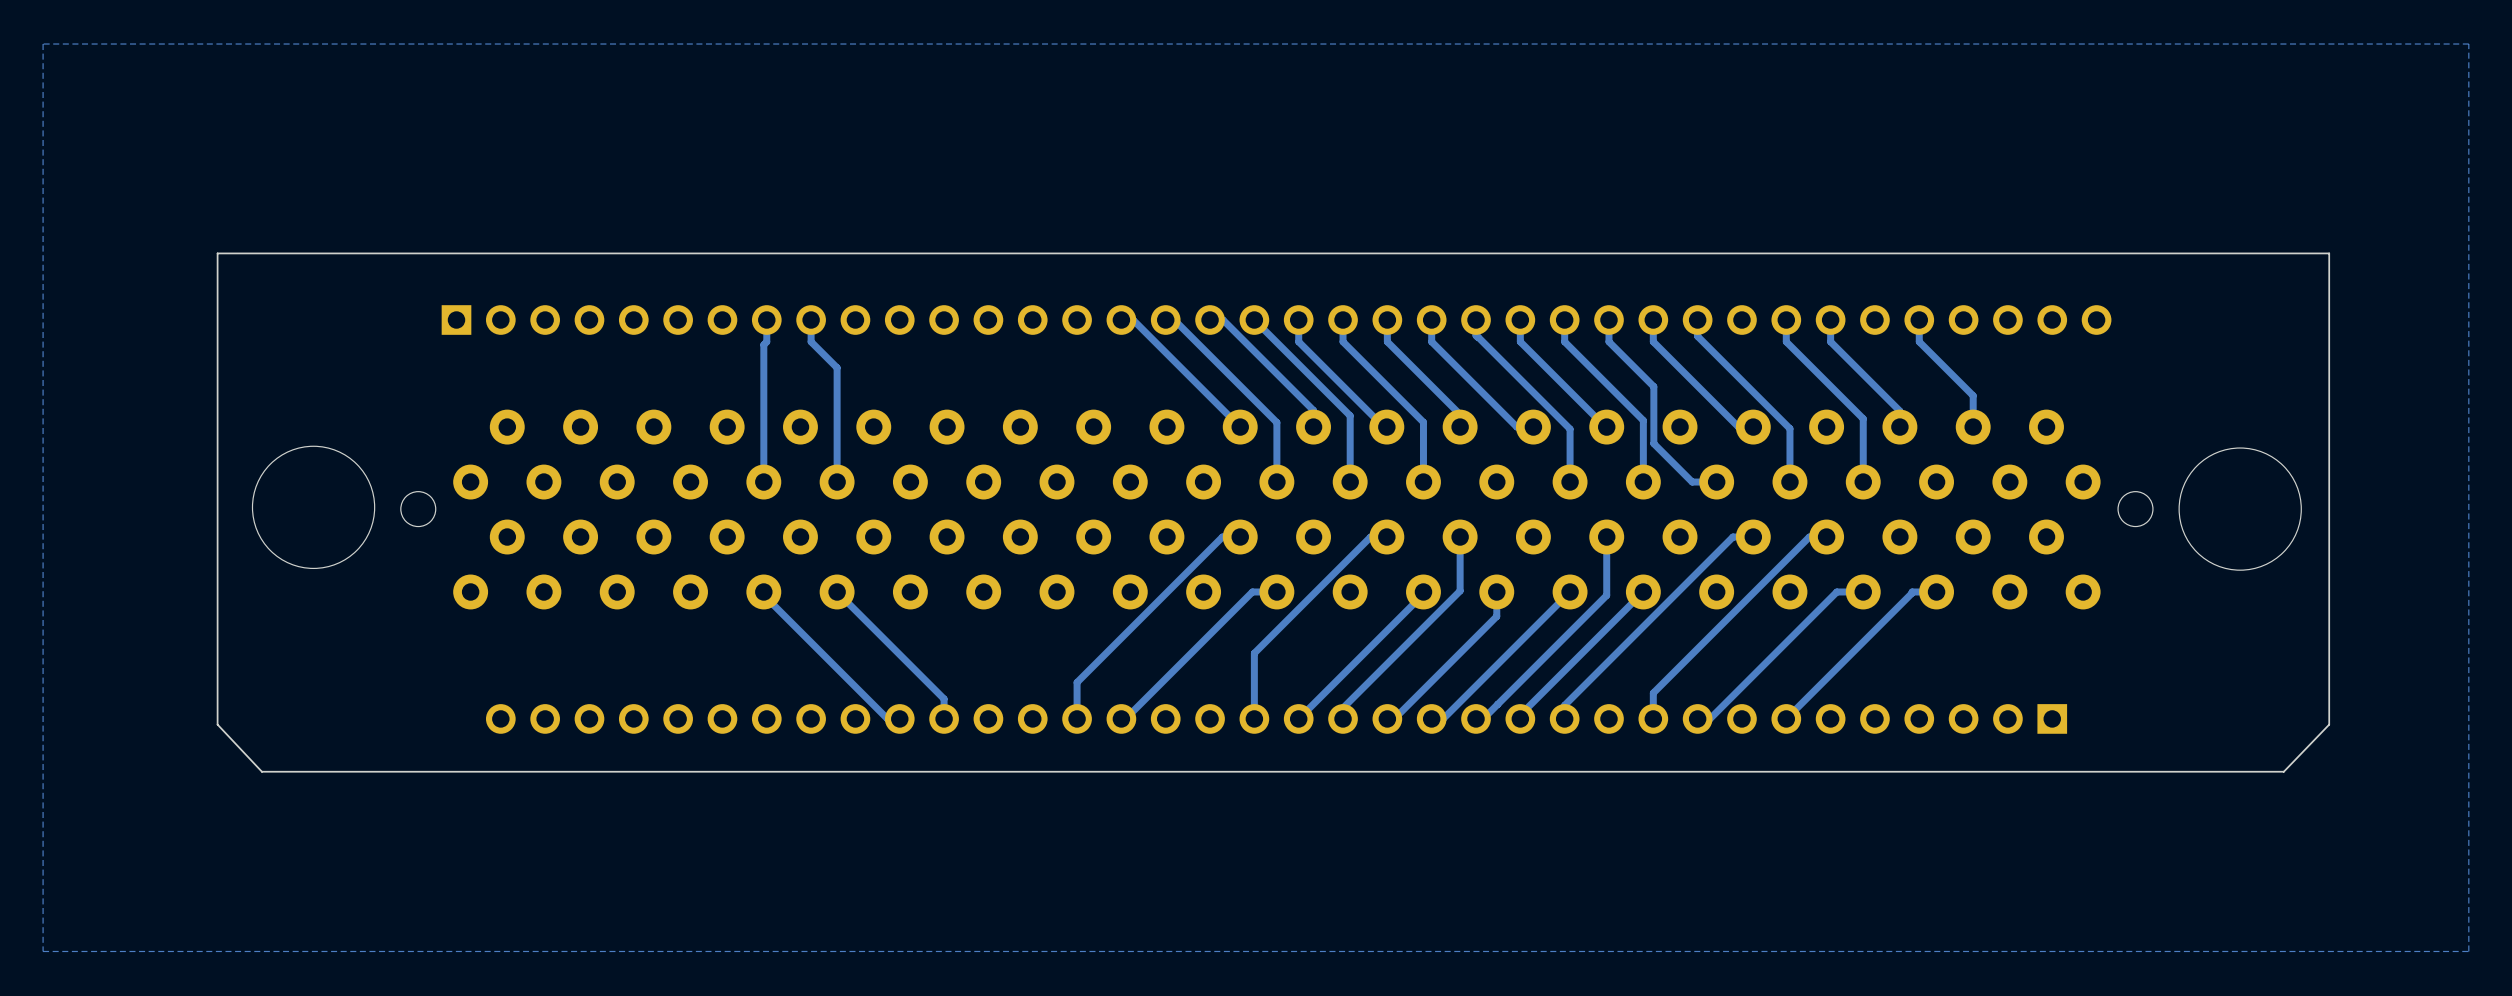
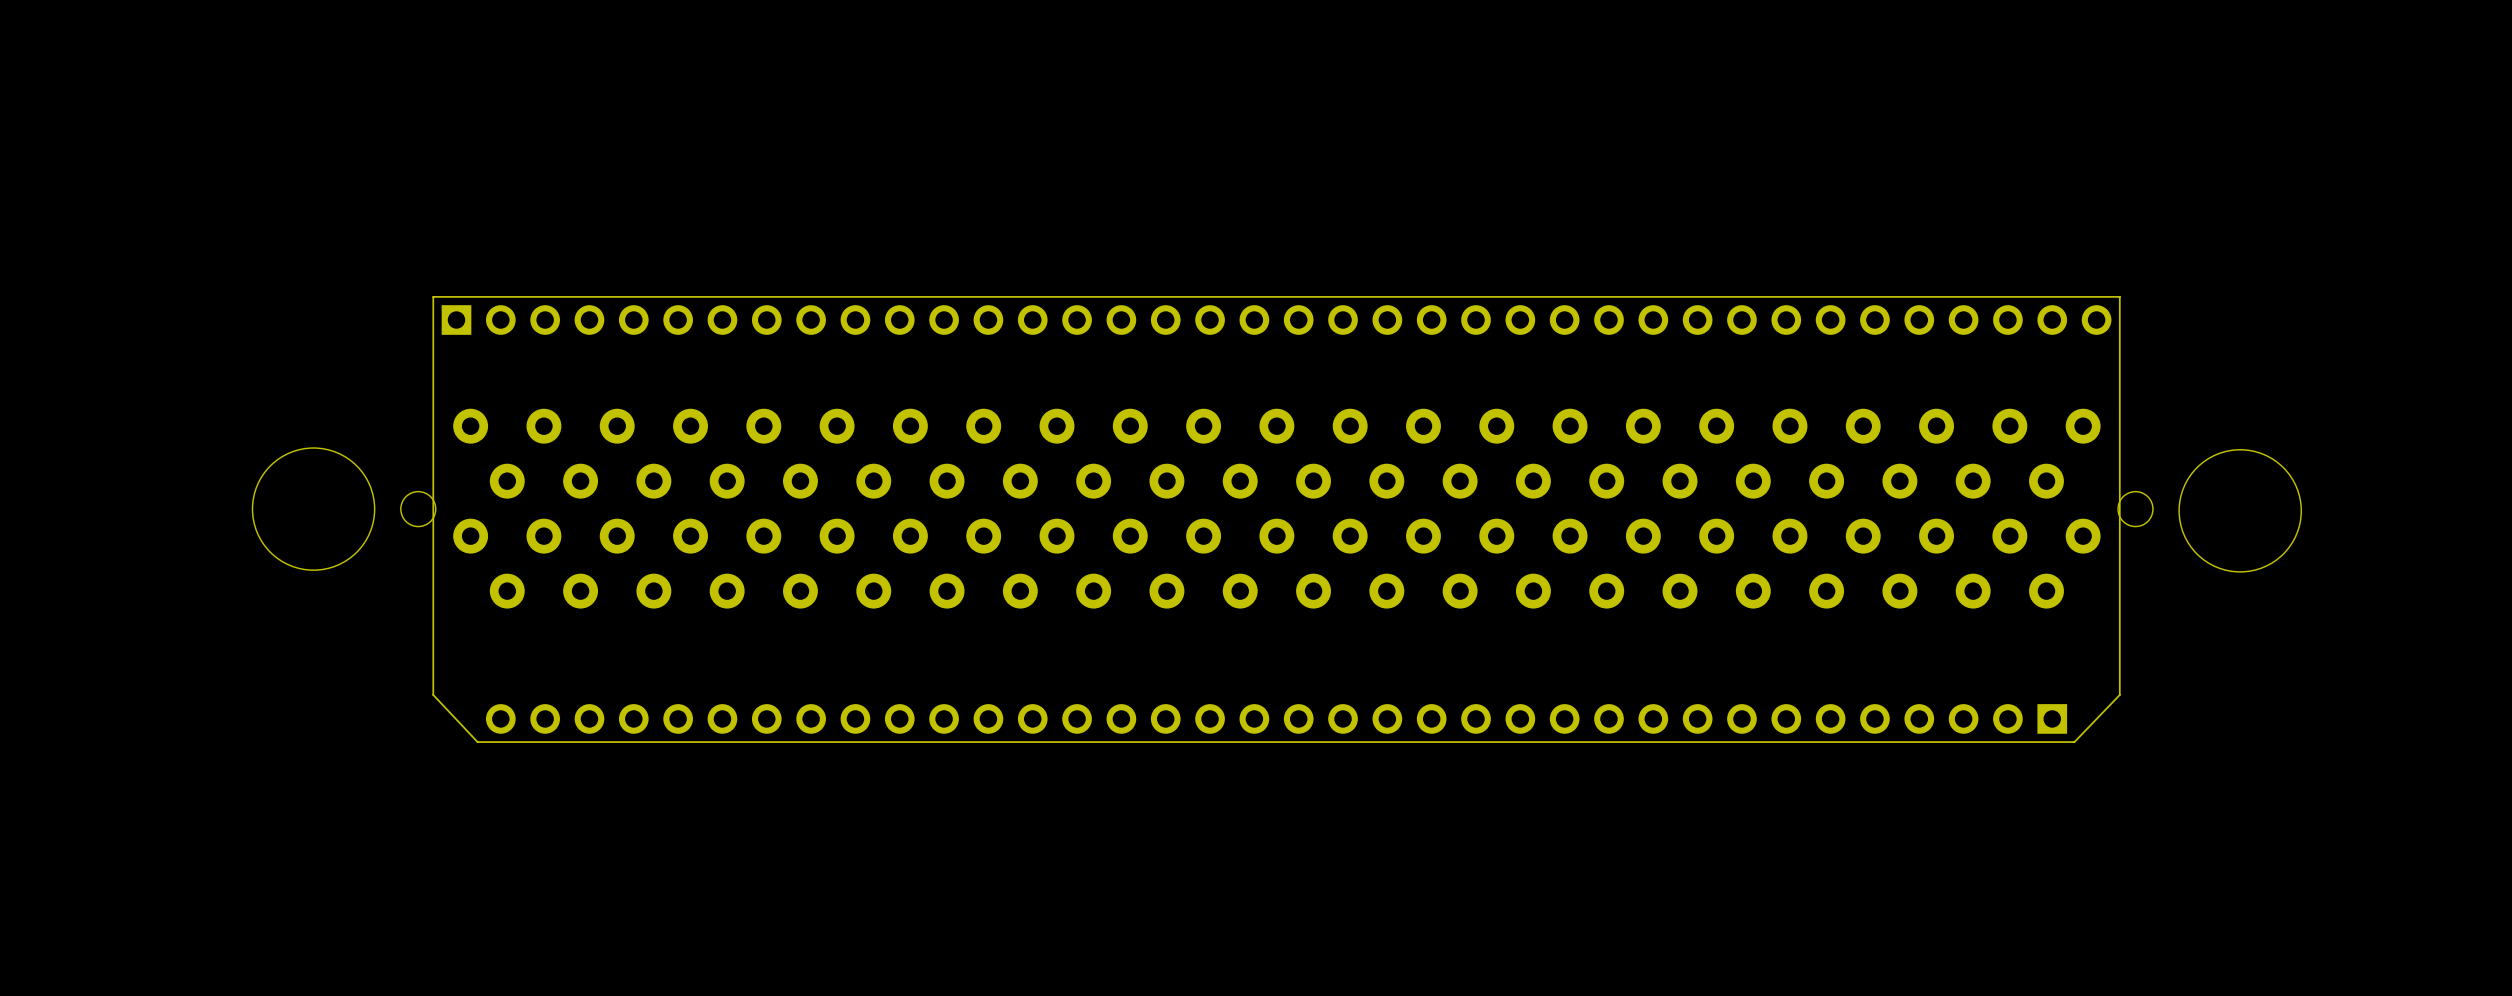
zone outline: (2468, 44) (43, 44) (43, 951) (2468, 951) (2468, 44) -> none
board edge: (2329, 253) (2329, 724) (2283, 771) (261, 771) (217, 724) (217, 253) (2329, 253) -> (2119, 296) (2119, 694) (2074, 742) (477, 742) (433, 694) (433, 296) (2119, 296)
track: (766, 320) (766, 341) (763, 344) (763, 482) -> none
track: (811, 320) (811, 341) (837, 367) (837, 482) -> none
track: (1121, 320) (1133, 320) (1240, 427) -> none
track: (1165, 320) (1174, 320) (1276, 422) (1276, 482) -> none
track: (1210, 320) (1223, 320) (1313, 410) (1313, 427) -> none
track: (1254, 320) (1350, 415) (1350, 482) -> none
track: (1298, 320) (1298, 341) (1383, 427) (1386, 427) -> none
track: (1343, 320) (1343, 341) (1423, 422) (1423, 482) -> none
track: (1387, 320) (1387, 341) (1460, 414) (1460, 427) -> none
track: (1431, 320) (1431, 341) (1516, 427) (1533, 427) -> none
track: (1476, 320) (1476, 335) (1570, 429) (1570, 482) -> none
track: (1520, 320) (1520, 341) (1606, 427) -> none
track: (1564, 320) (1564, 341) (1643, 420) (1643, 482) -> none
track: (1608, 320) (1608, 341) (1653, 386) (1653, 443) (1692, 482) (1716, 482) -> none
track: (1653, 320) (1653, 341) (1738, 427) (1753, 427) -> none
track: (1697, 320) (1697, 336) (1789, 428) (1789, 482) -> none
track: (1786, 320) (1786, 341) (1863, 418) (1863, 482) -> none
track: (1830, 320) (1830, 341) (1899, 411) (1899, 427) -> none
track: (1919, 320) (1919, 341) (1973, 395) (1973, 427) -> none
part rotation: 0° (1276, 509) -> 180° (1276, 508)
track: (1240, 537) (1222, 537) (1077, 682) (1077, 718) -> none
track: (1386, 537) (1370, 537) (1254, 653) (1254, 718) -> none
track: (1460, 537) (1460, 590) (1343, 708) (1343, 718) -> none
track: (1606, 537) (1606, 595) (1483, 718) (1476, 718) -> none
track: (1753, 537) (1732, 537) (1564, 705) (1564, 718) -> none
track: (1826, 537) (1809, 537) (1653, 693) (1653, 718) -> none
track: (763, 591) (763, 595) (887, 718) (899, 718) -> none
track: (837, 591) (944, 698) (944, 718) -> none
track: (1276, 591) (1252, 591) (1125, 718) (1121, 718) -> none
track: (1423, 591) (1423, 594) (1298, 718) -> none
track: (1496, 591) (1496, 616) (1394, 718) (1387, 718) -> none
track: (1570, 591) (1443, 718) (1431, 718) -> none
track: (1643, 591) (1520, 715) (1520, 718) -> none
track: (1863, 591) (1836, 591) (1709, 718) (1697, 718) -> none
track: (1936, 591) (1912, 591) (1786, 718) -> none

